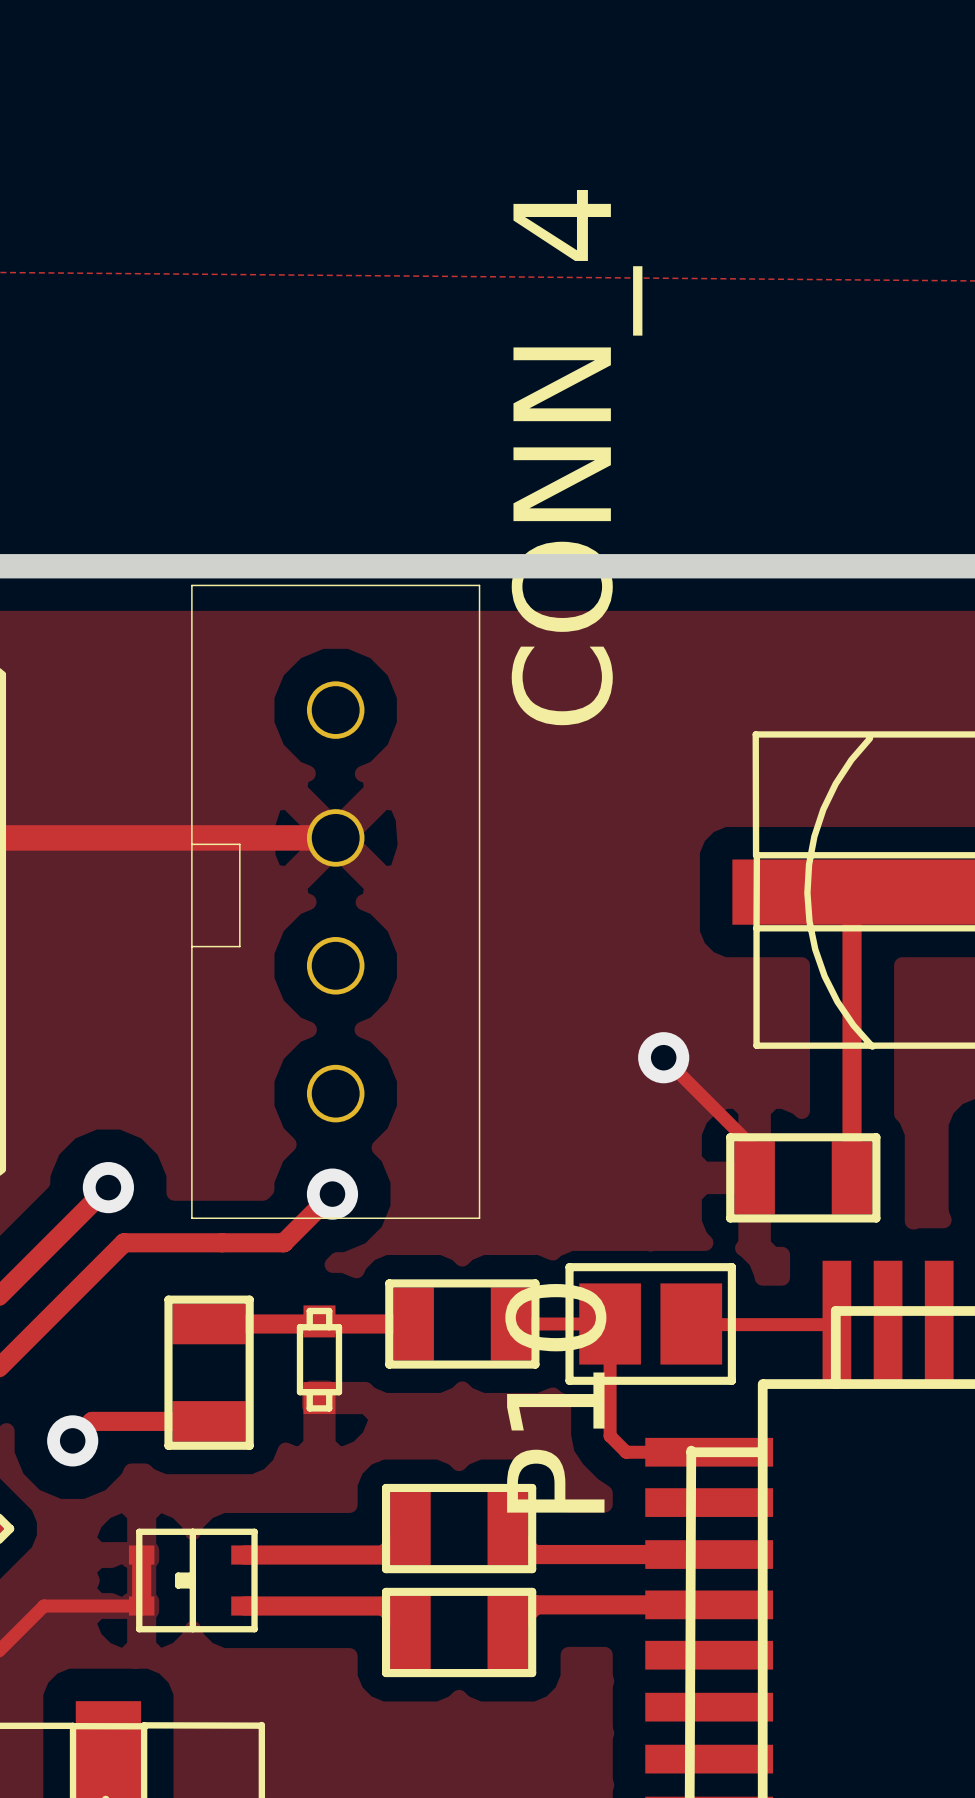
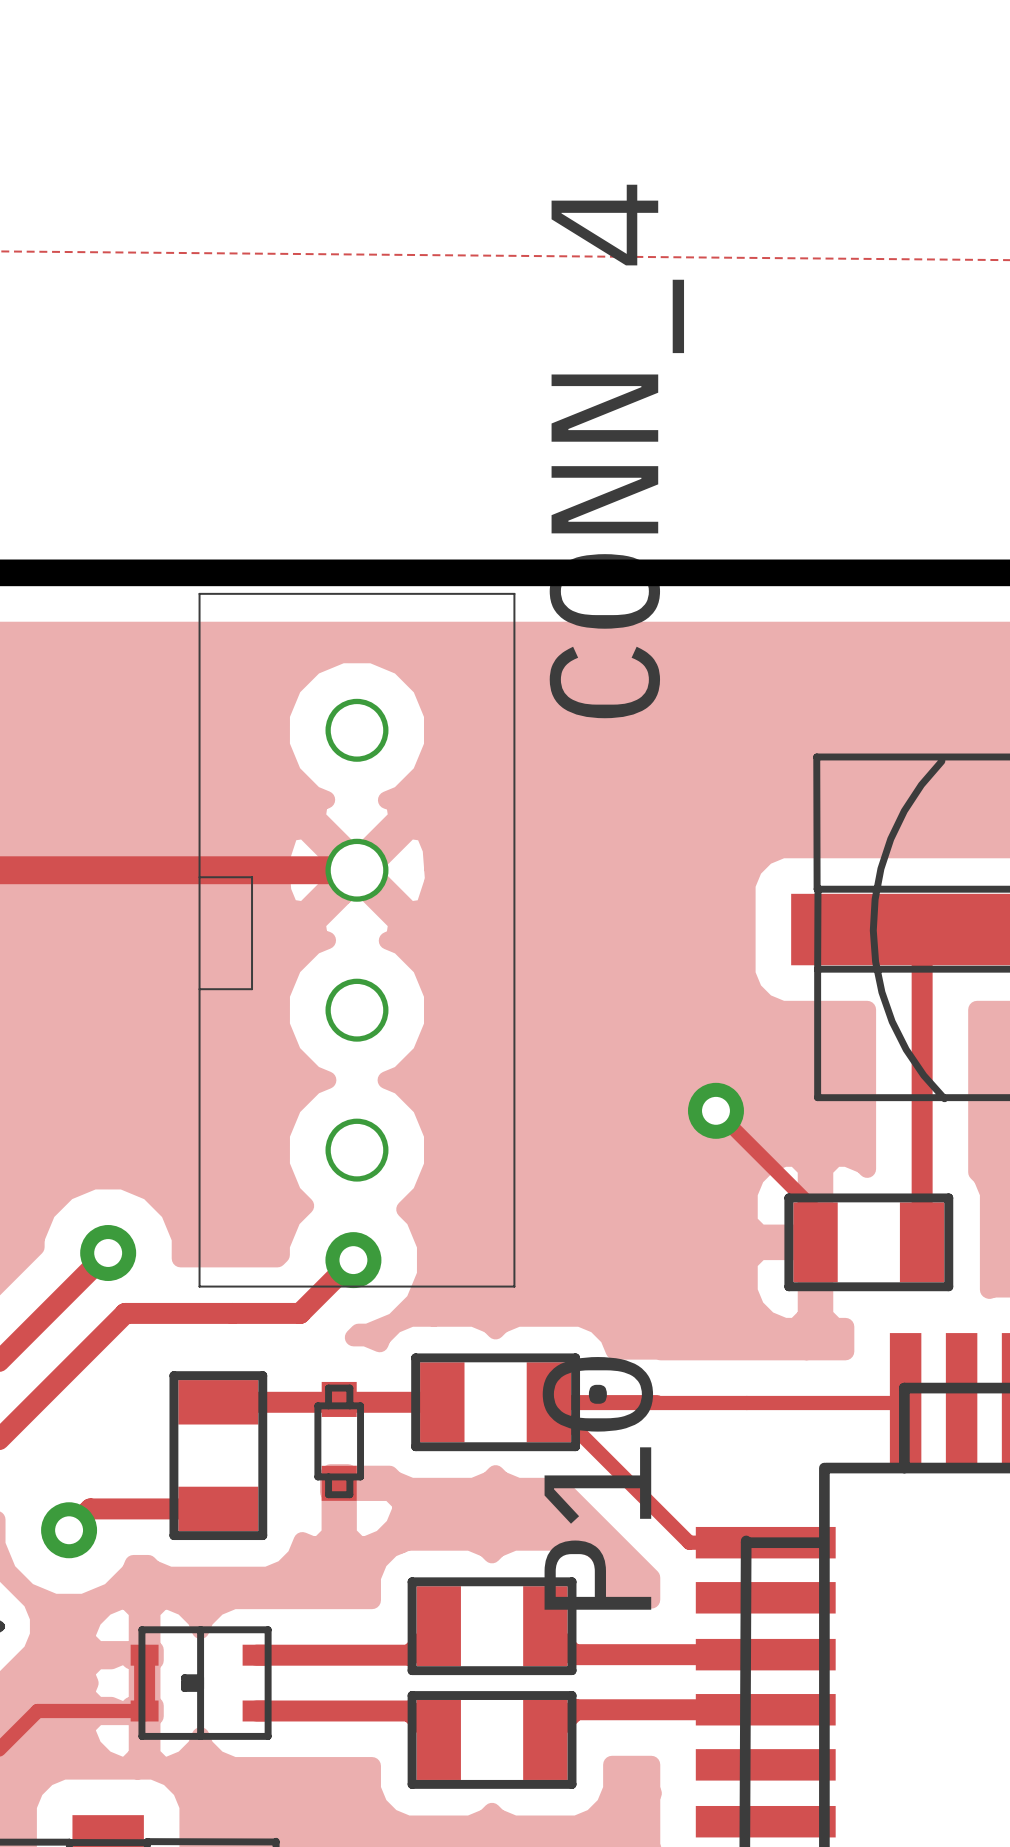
track: (610, 1323) (610, 1436) (626, 1452) (639, 1452) -> (548, 1402) (689, 1542)
part: (650, 1323) -> none
track: none -> (549, 1403) (746, 1403)

